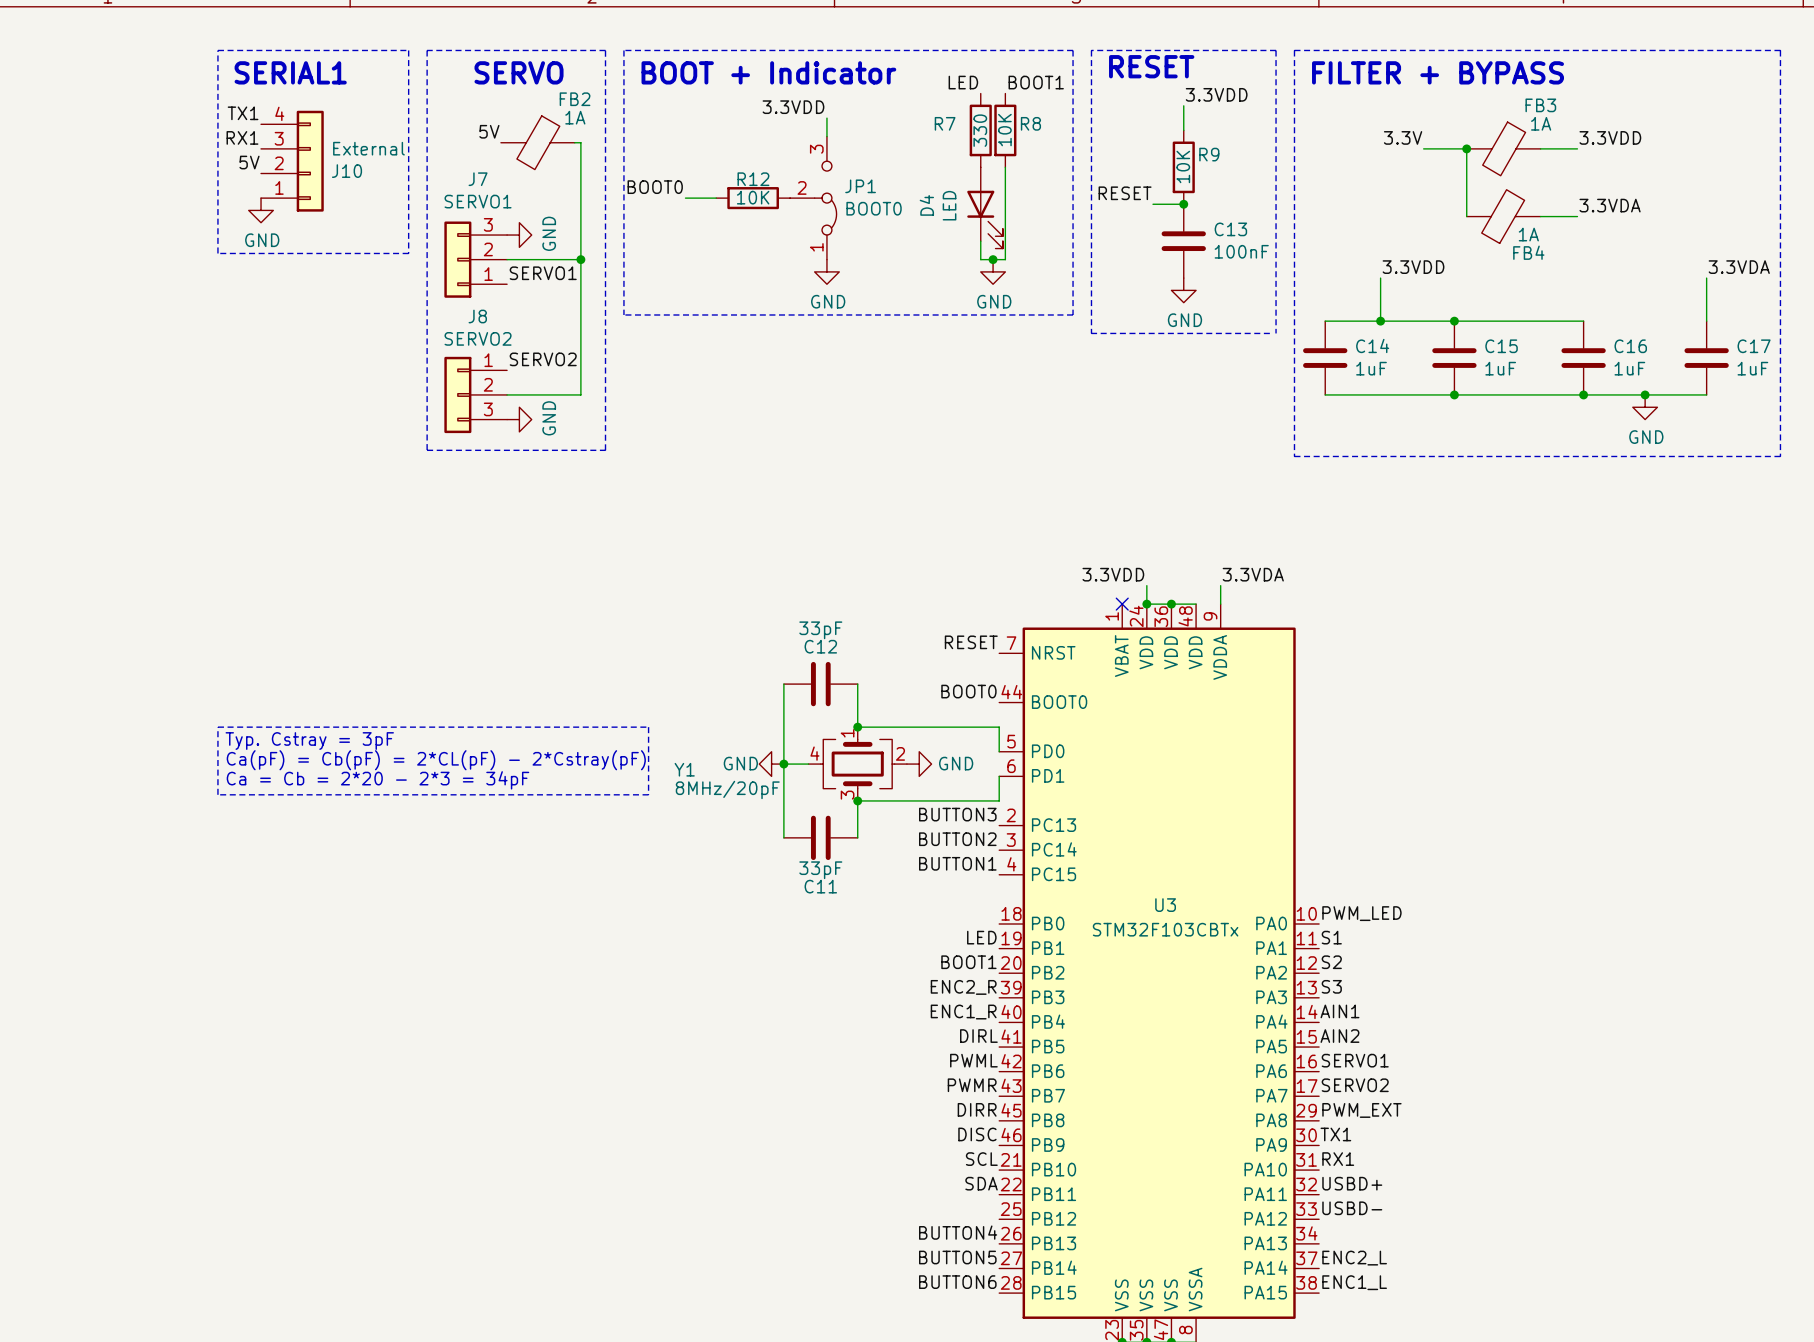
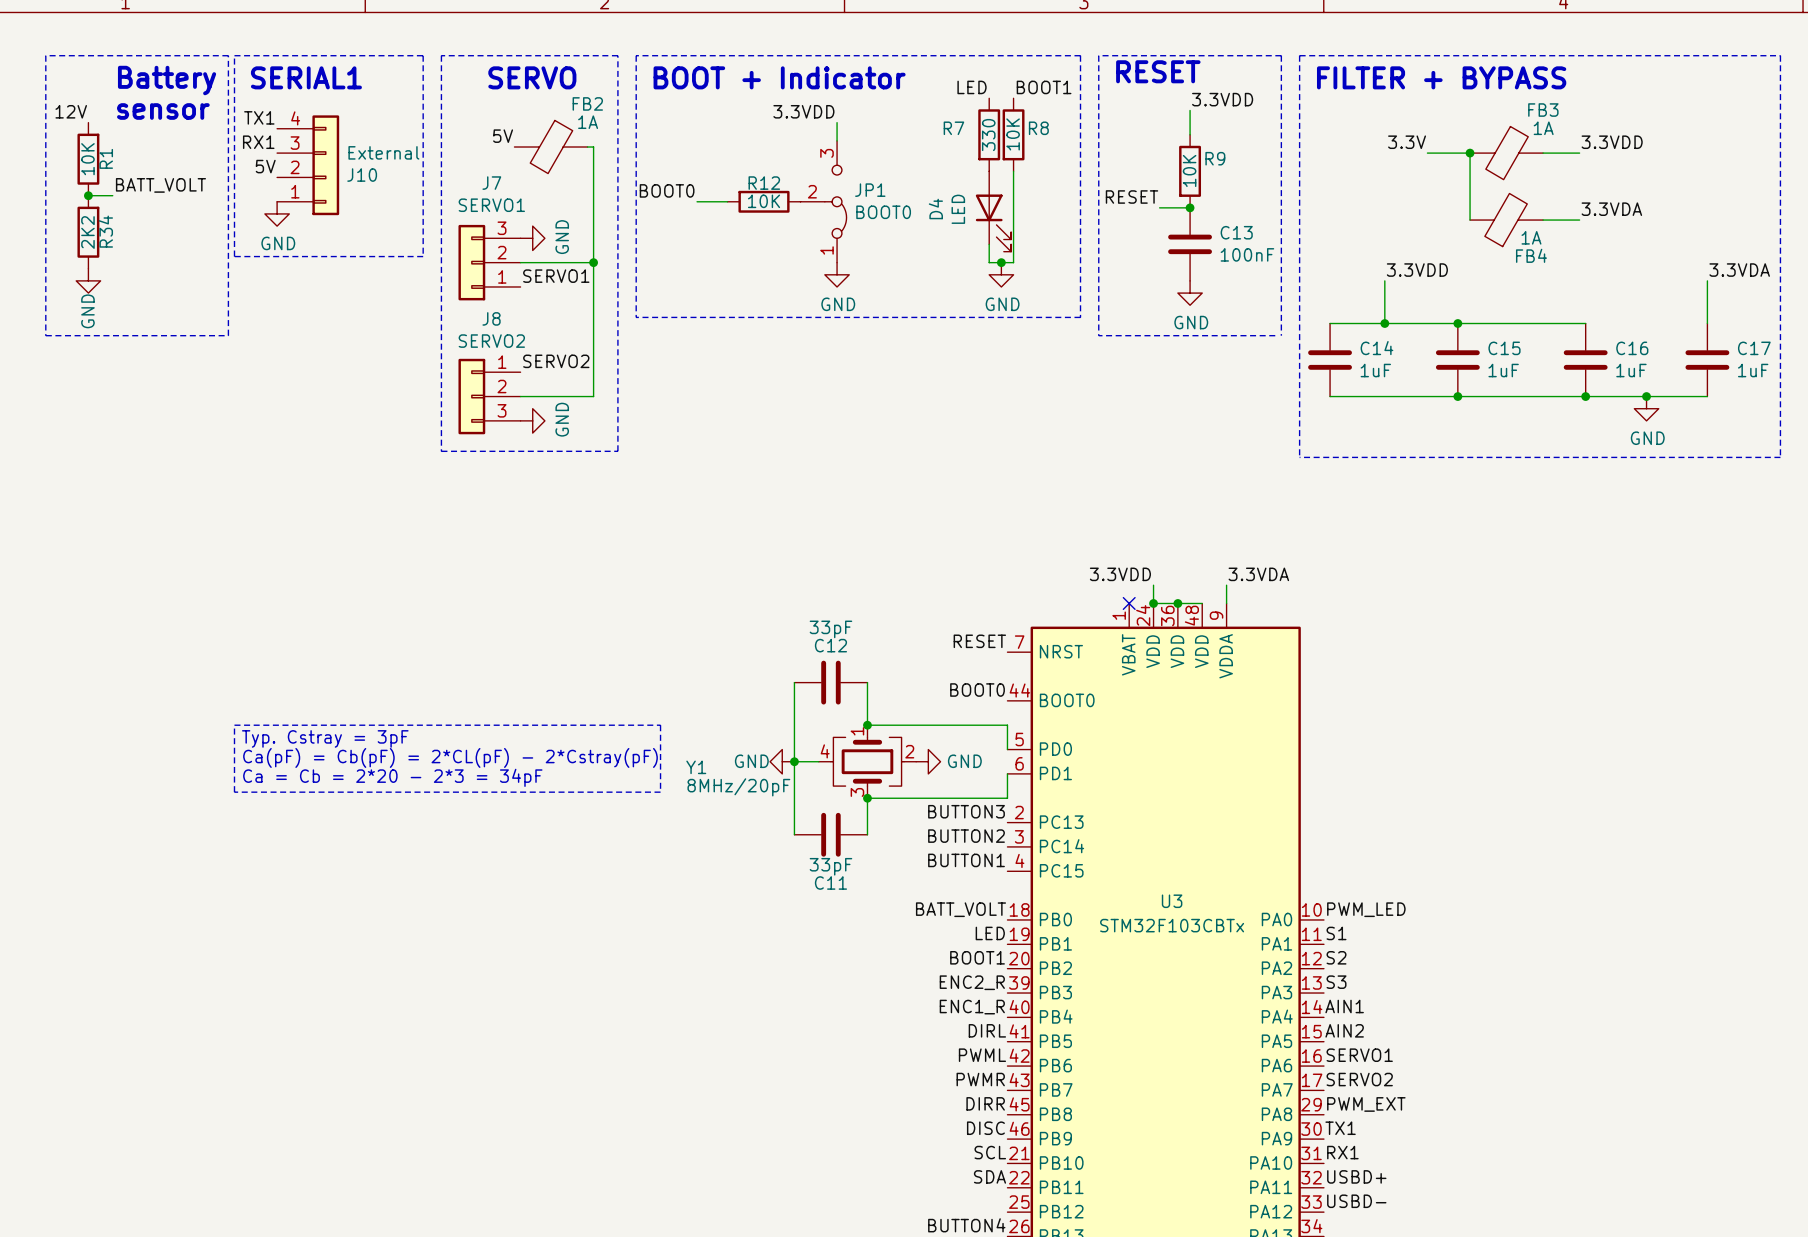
line: none -> (45, 55) (228, 55) (228, 335) (45, 335) (45, 55)
text: none -> Battery (167, 80)
text: none -> sensor (163, 111)
label: none -> 12V (71, 111)
R1: none -> 10K (88, 159)
label: none -> BATT_VOLT (160, 185)
wire: none -> (88, 195) (112, 195)
junction: none -> (88, 195)
R34: none -> 2K2 (88, 232)
power symbol: none -> GND (88, 280)
label: none -> BATT_VOLT (961, 909)

